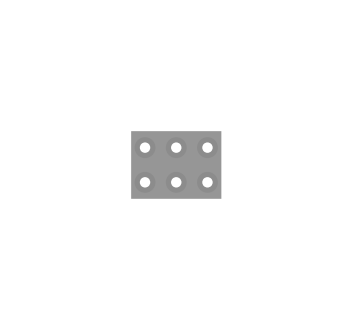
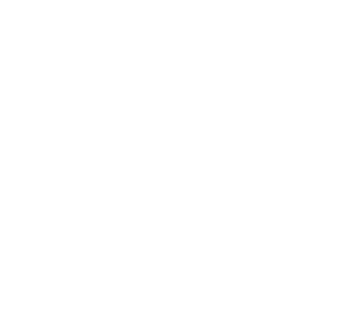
part: (176, 164) -> none

